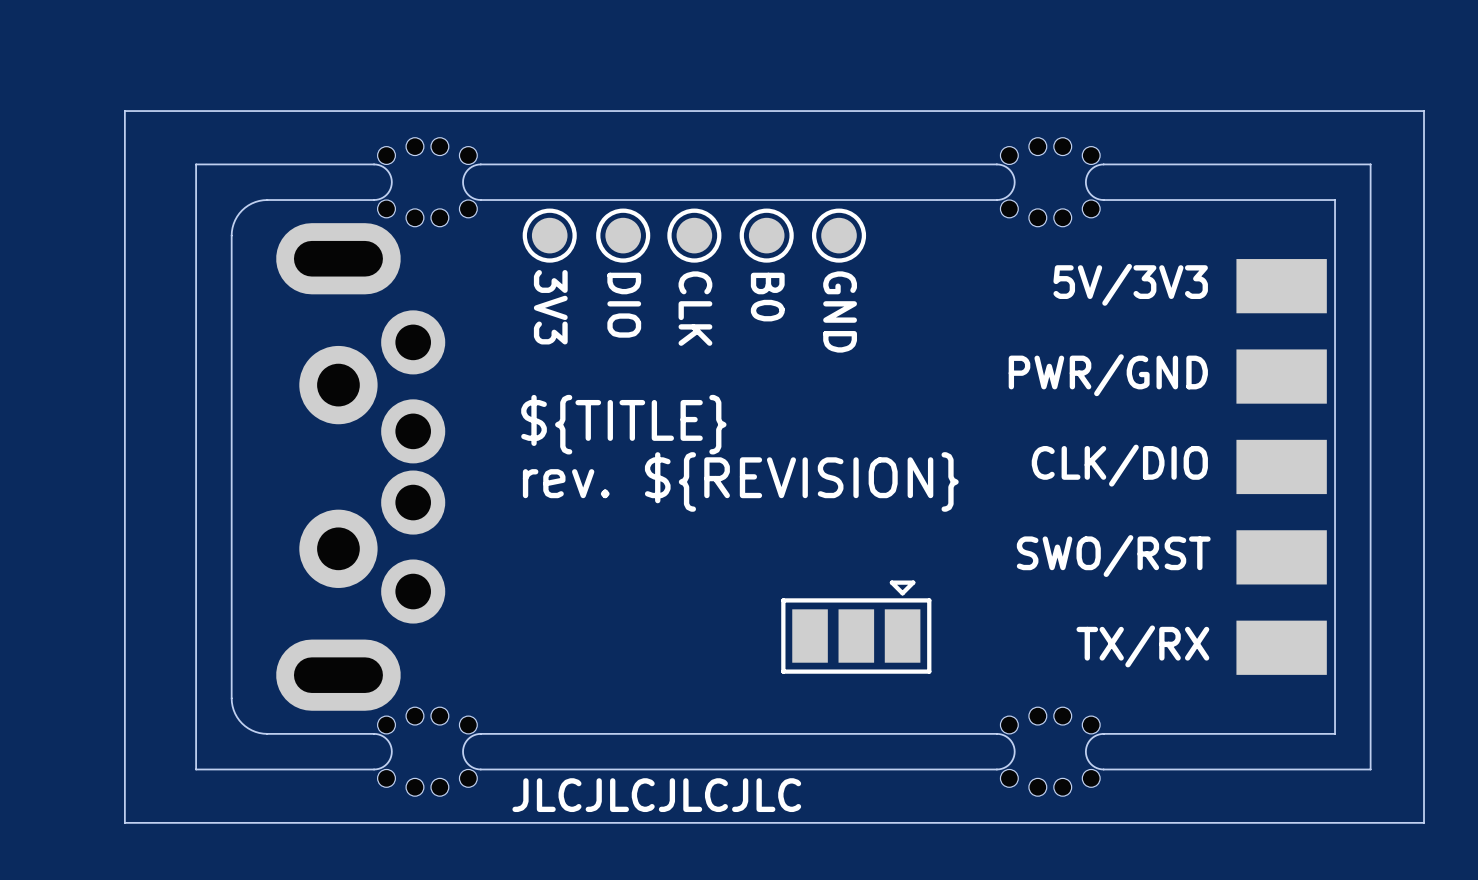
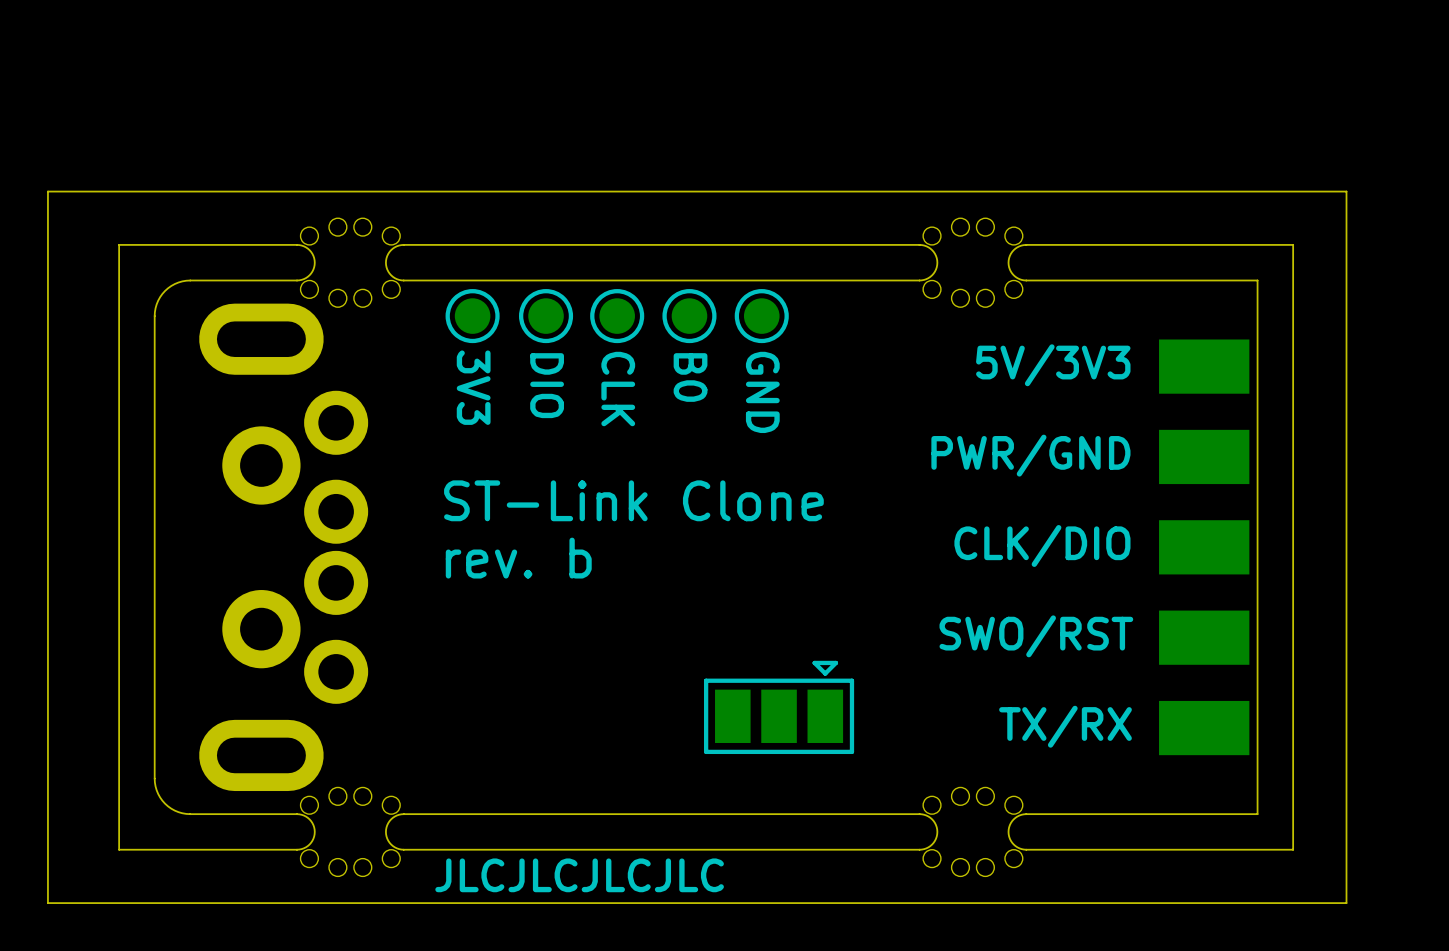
text: ${TITLE} (623, 424) -> ST-Link Clone (633, 500)
text: rev. ${REVISION} (740, 481) -> rev. b (518, 558)

